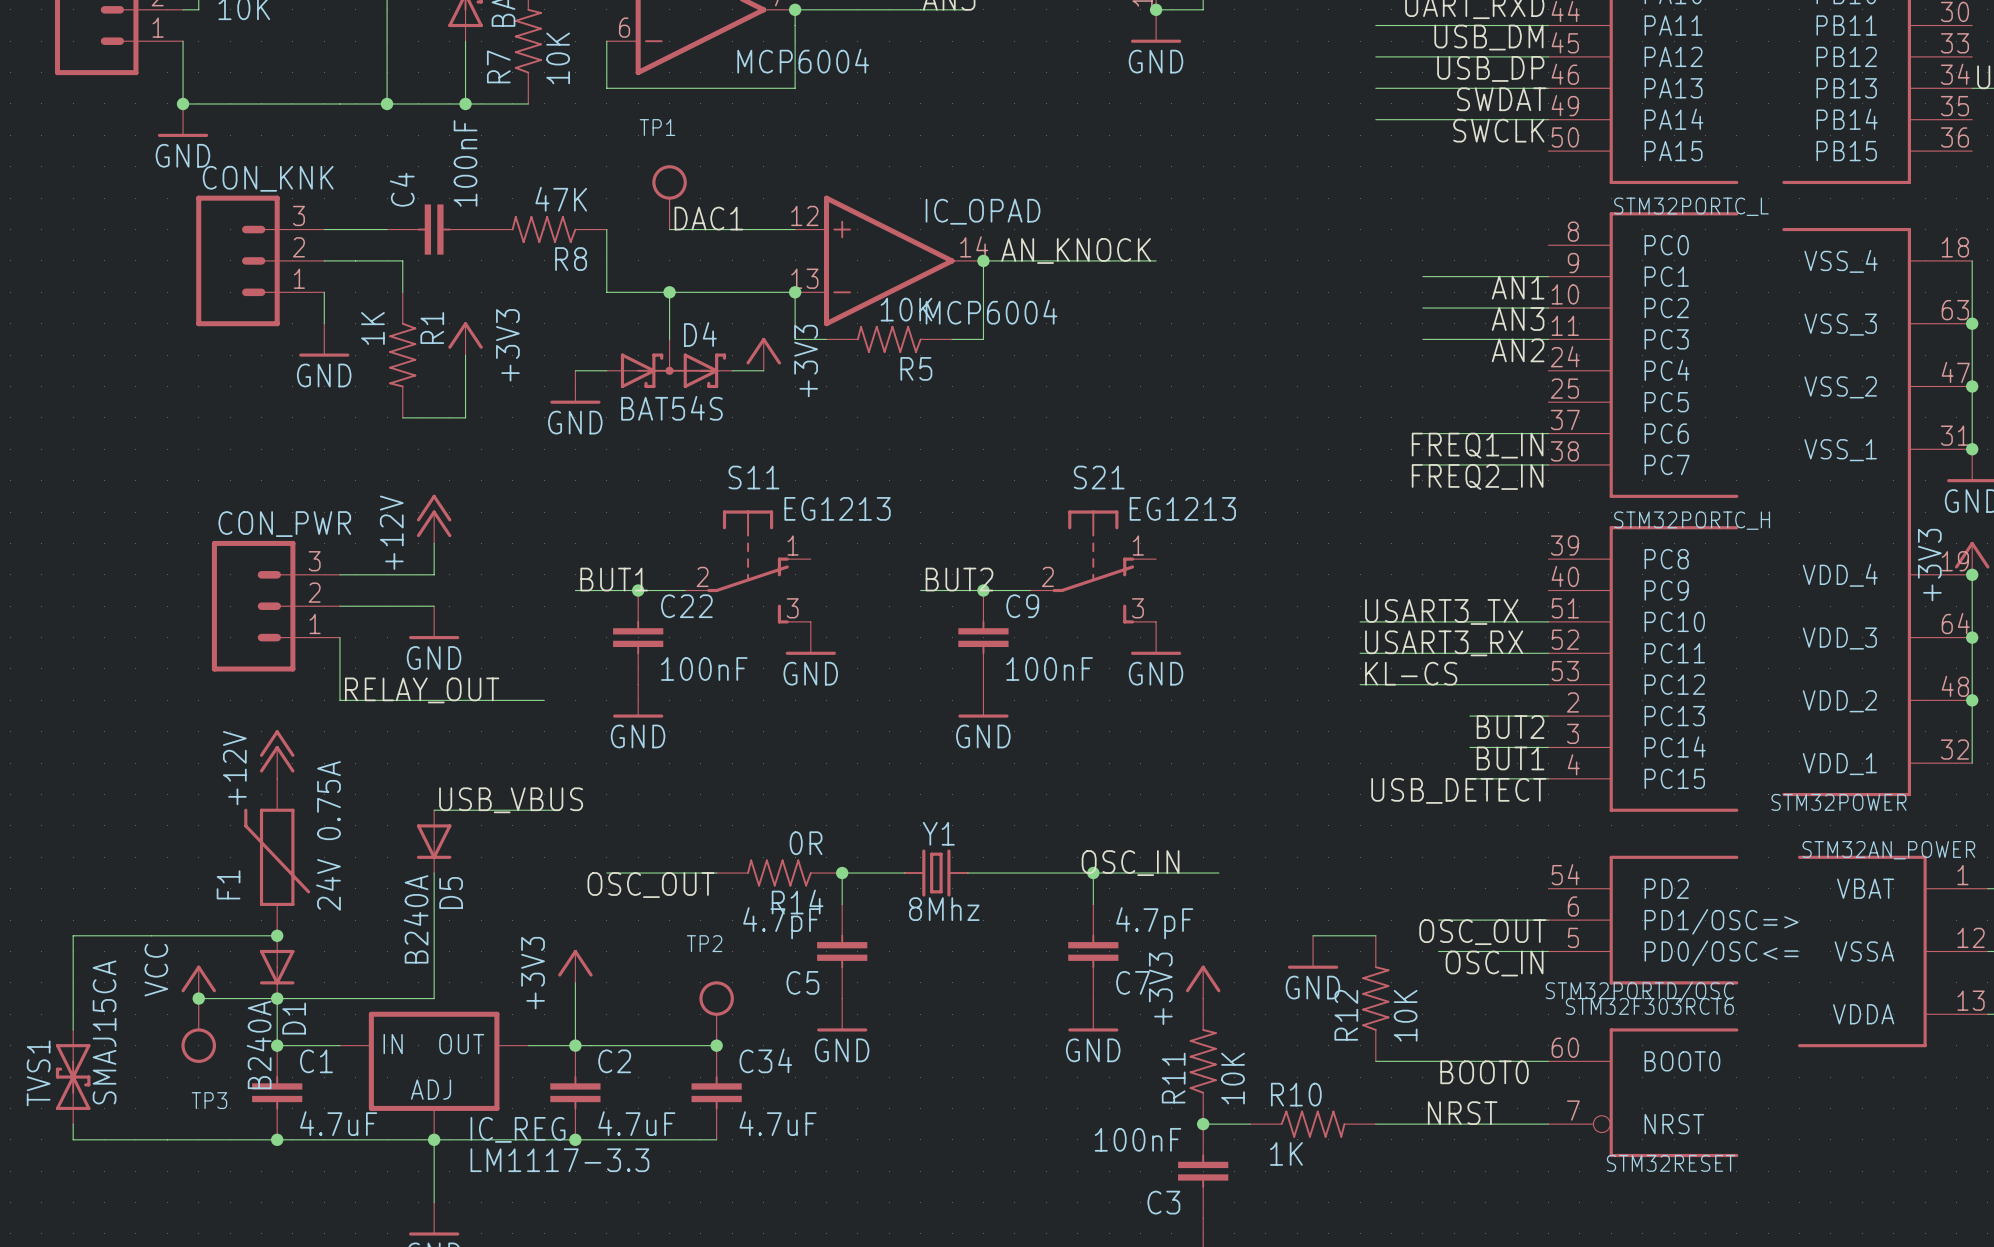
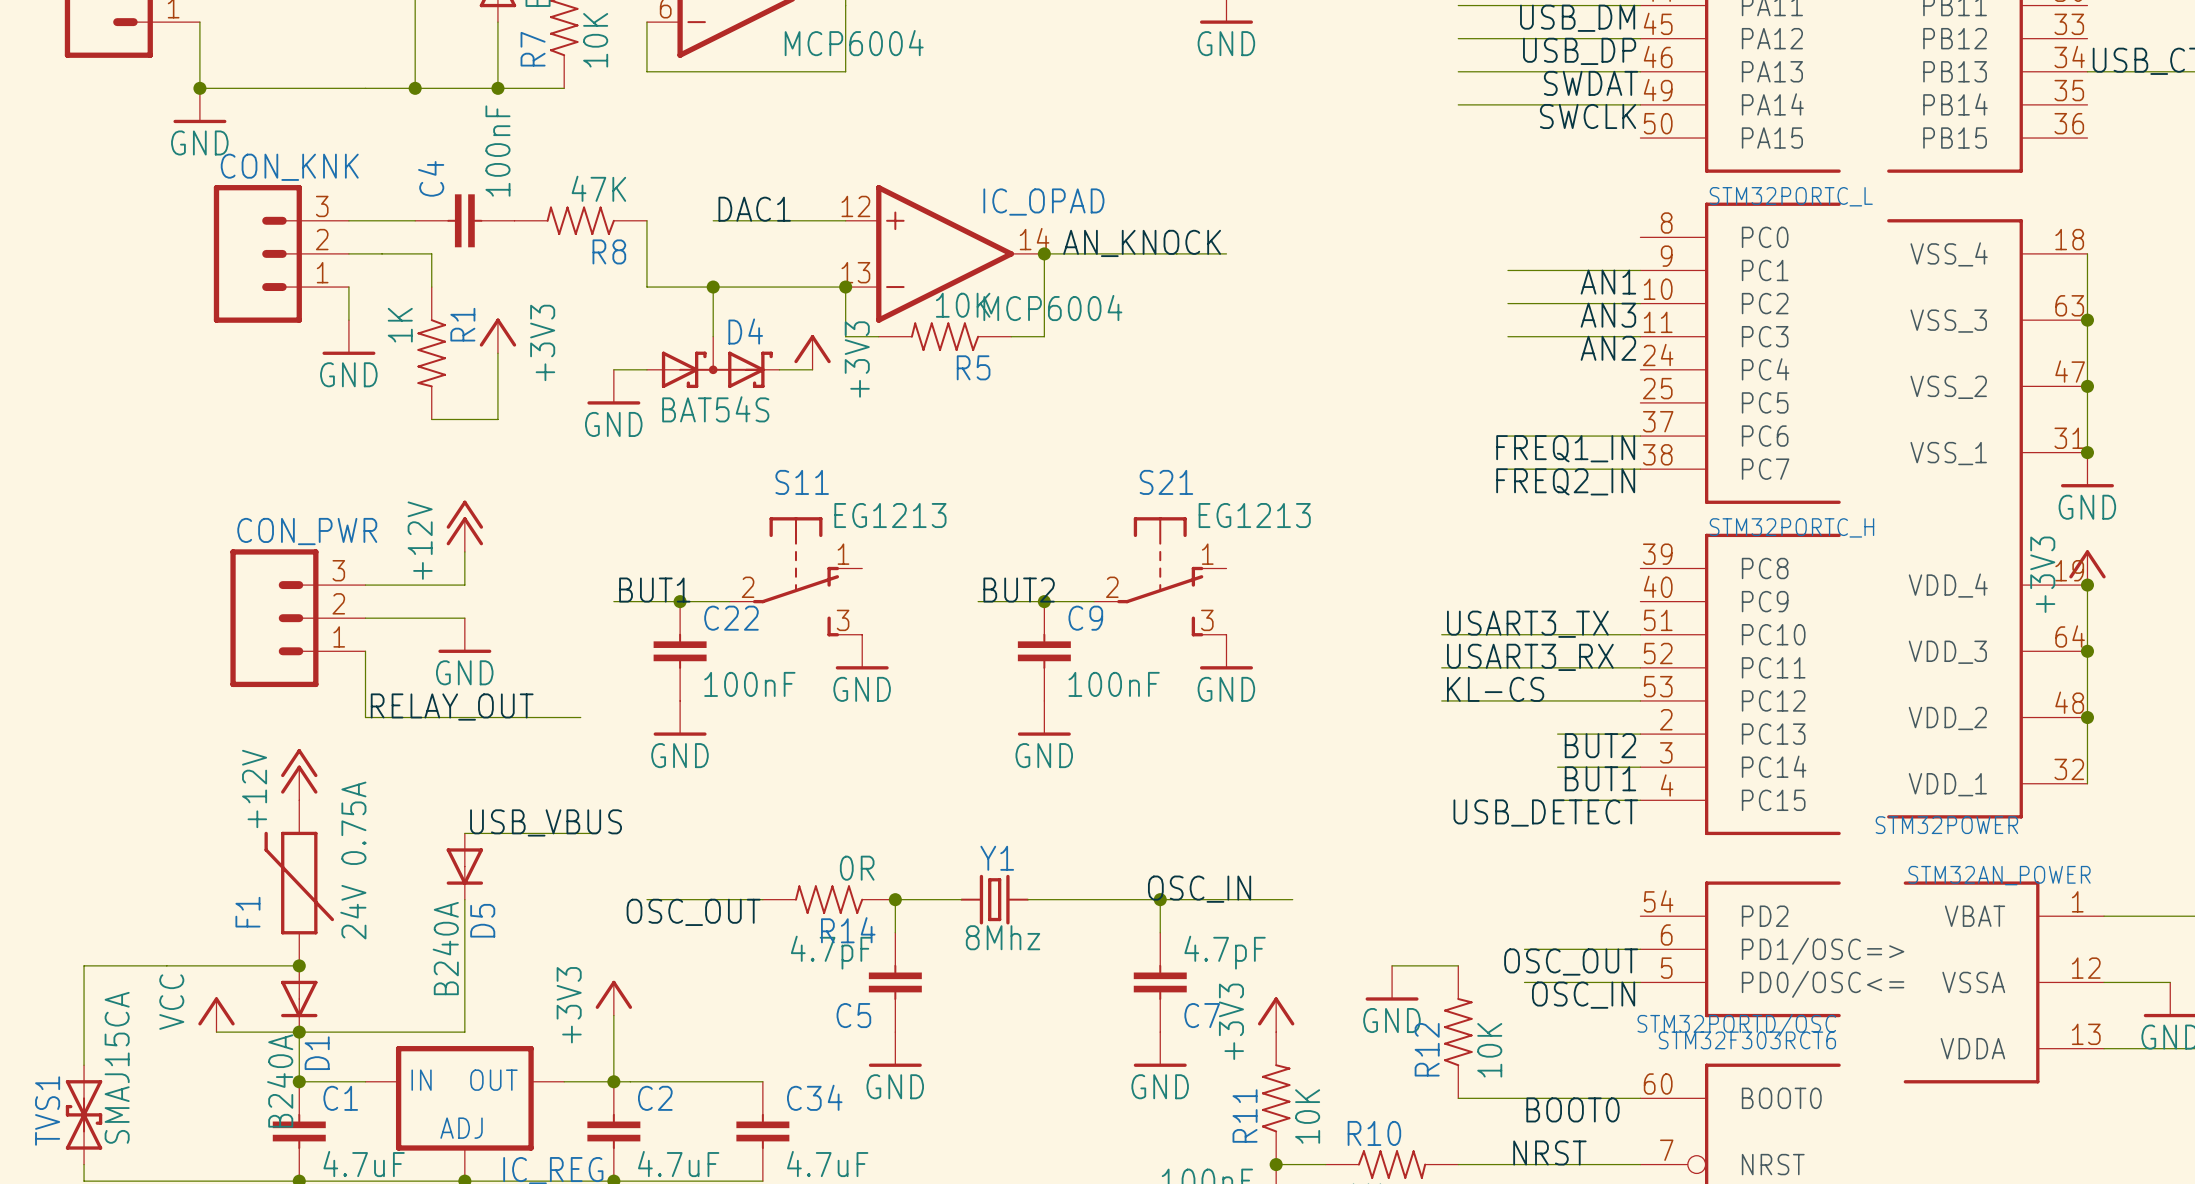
TP1: (669, 197) -> none
junction: (198, 998) -> none
TP2: (716, 1013) -> none
TP3: (198, 1030) -> none
junction: (716, 1045) -> none

